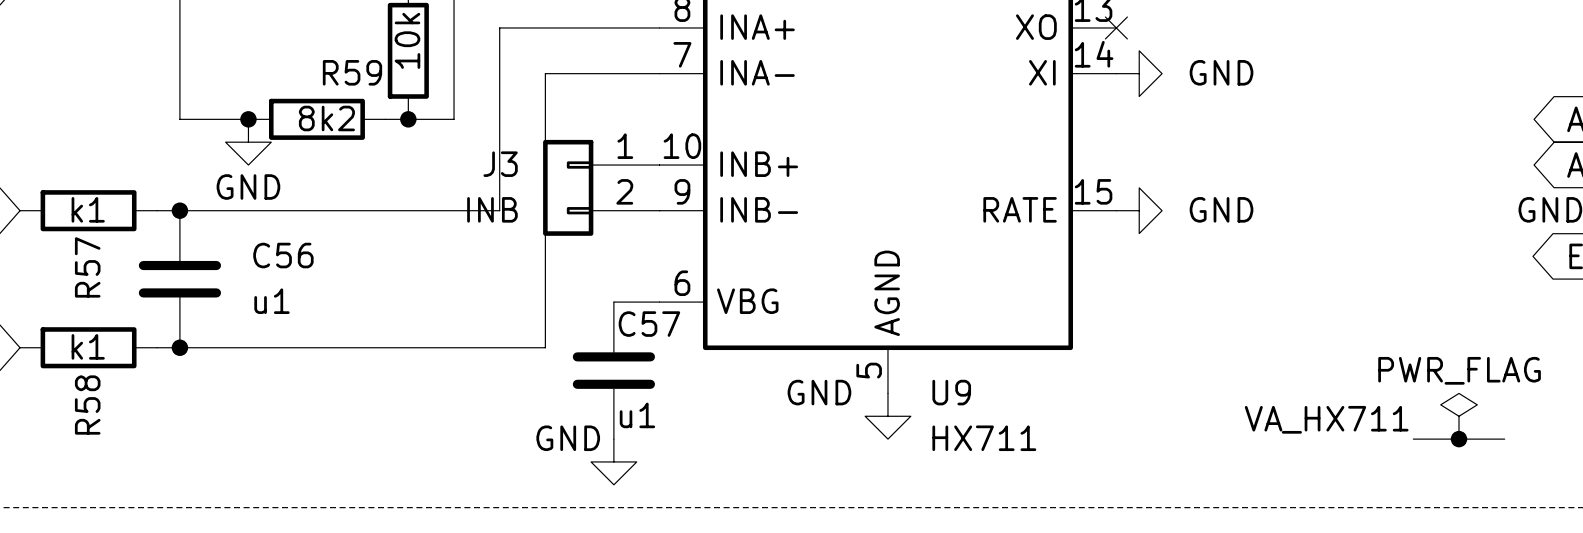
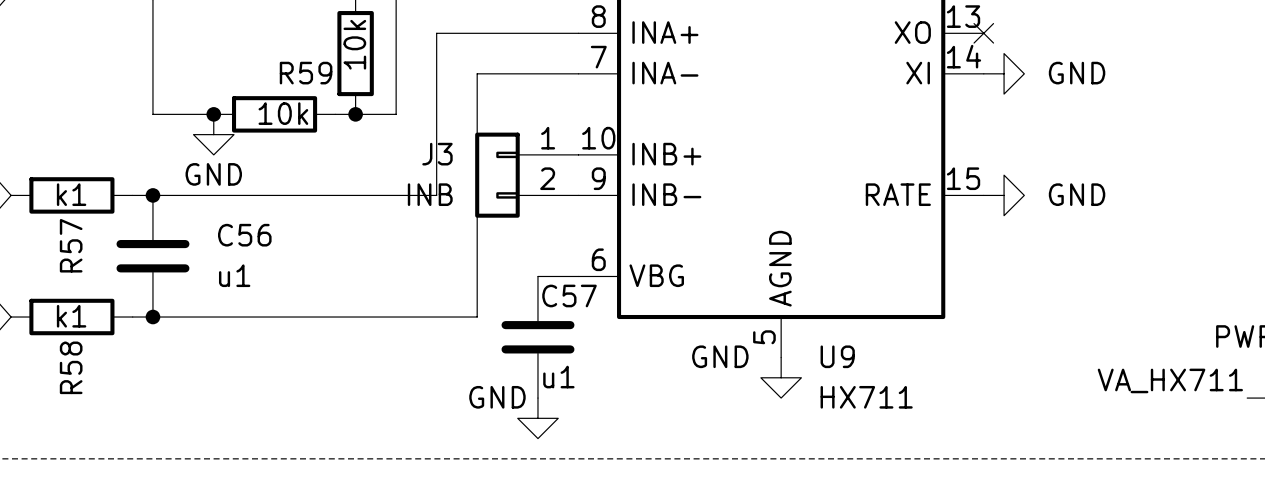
R59 value: 8k2 (326, 118) -> 10k (283, 113)

